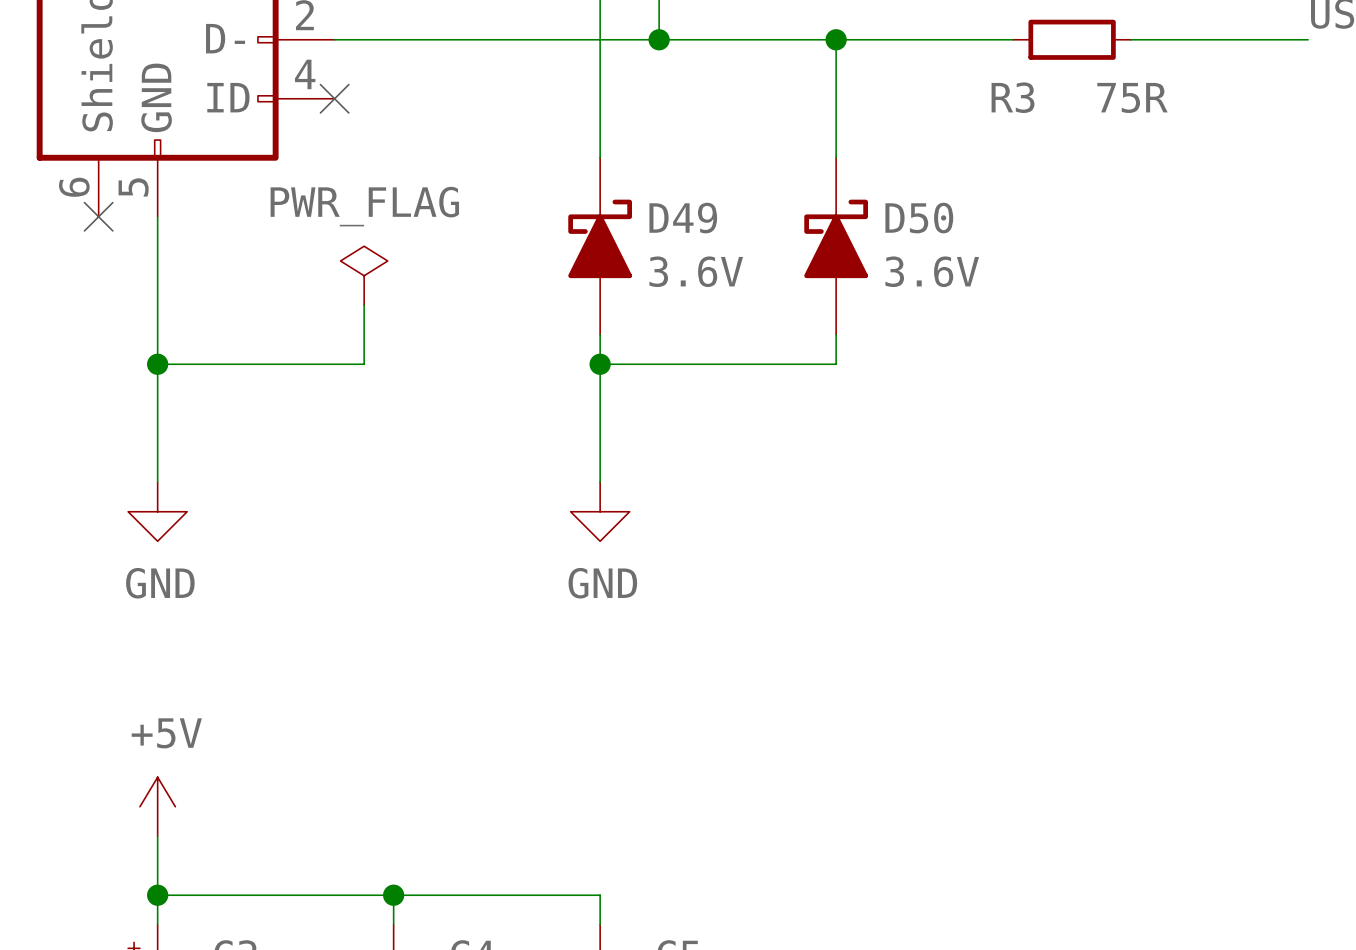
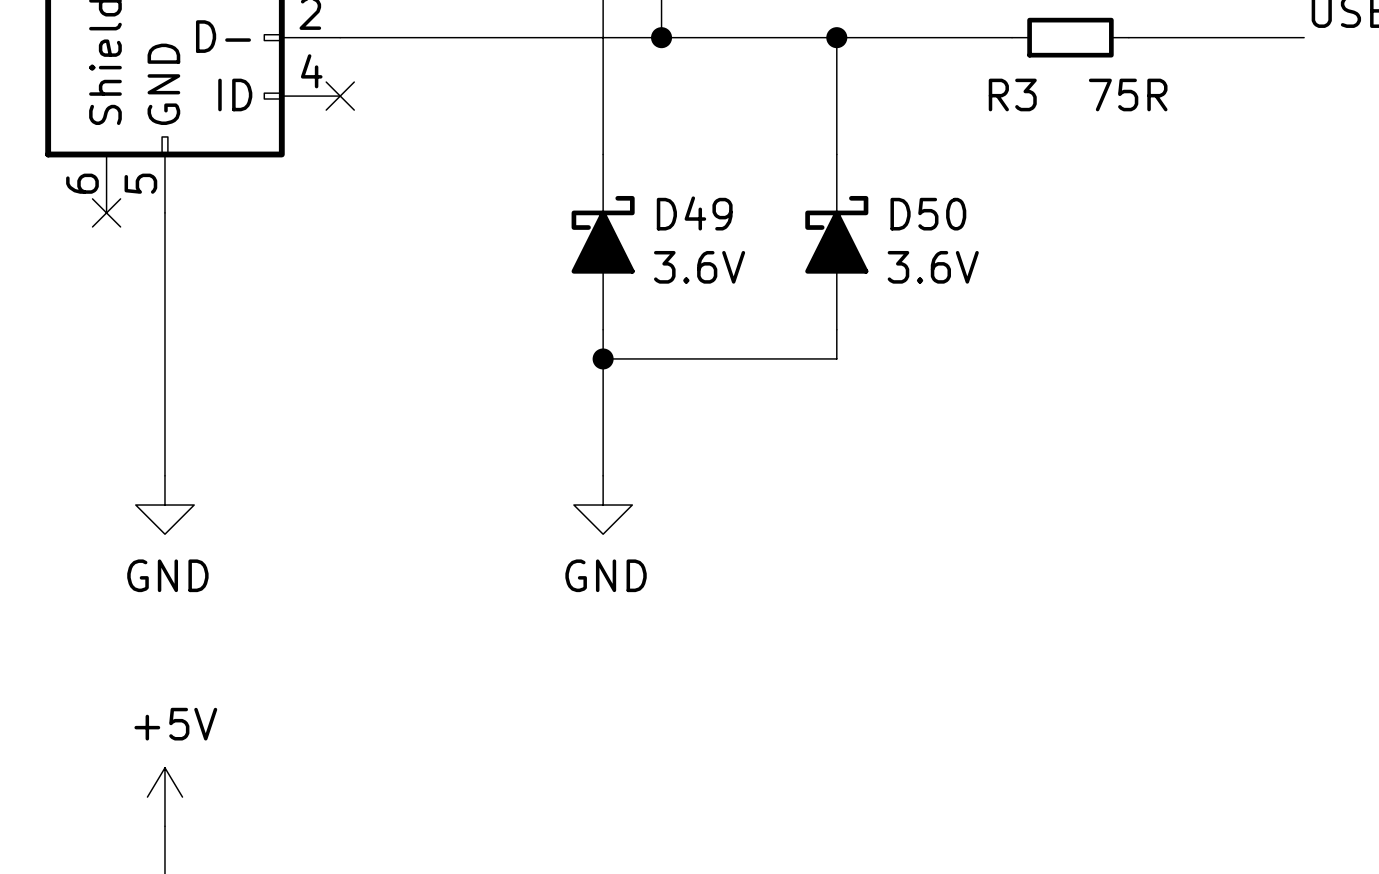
power symbol: PWR_FLAG (364, 275) -> none
wire: (364, 305) (364, 364) (157, 364) -> none
junction: (157, 364) -> none

